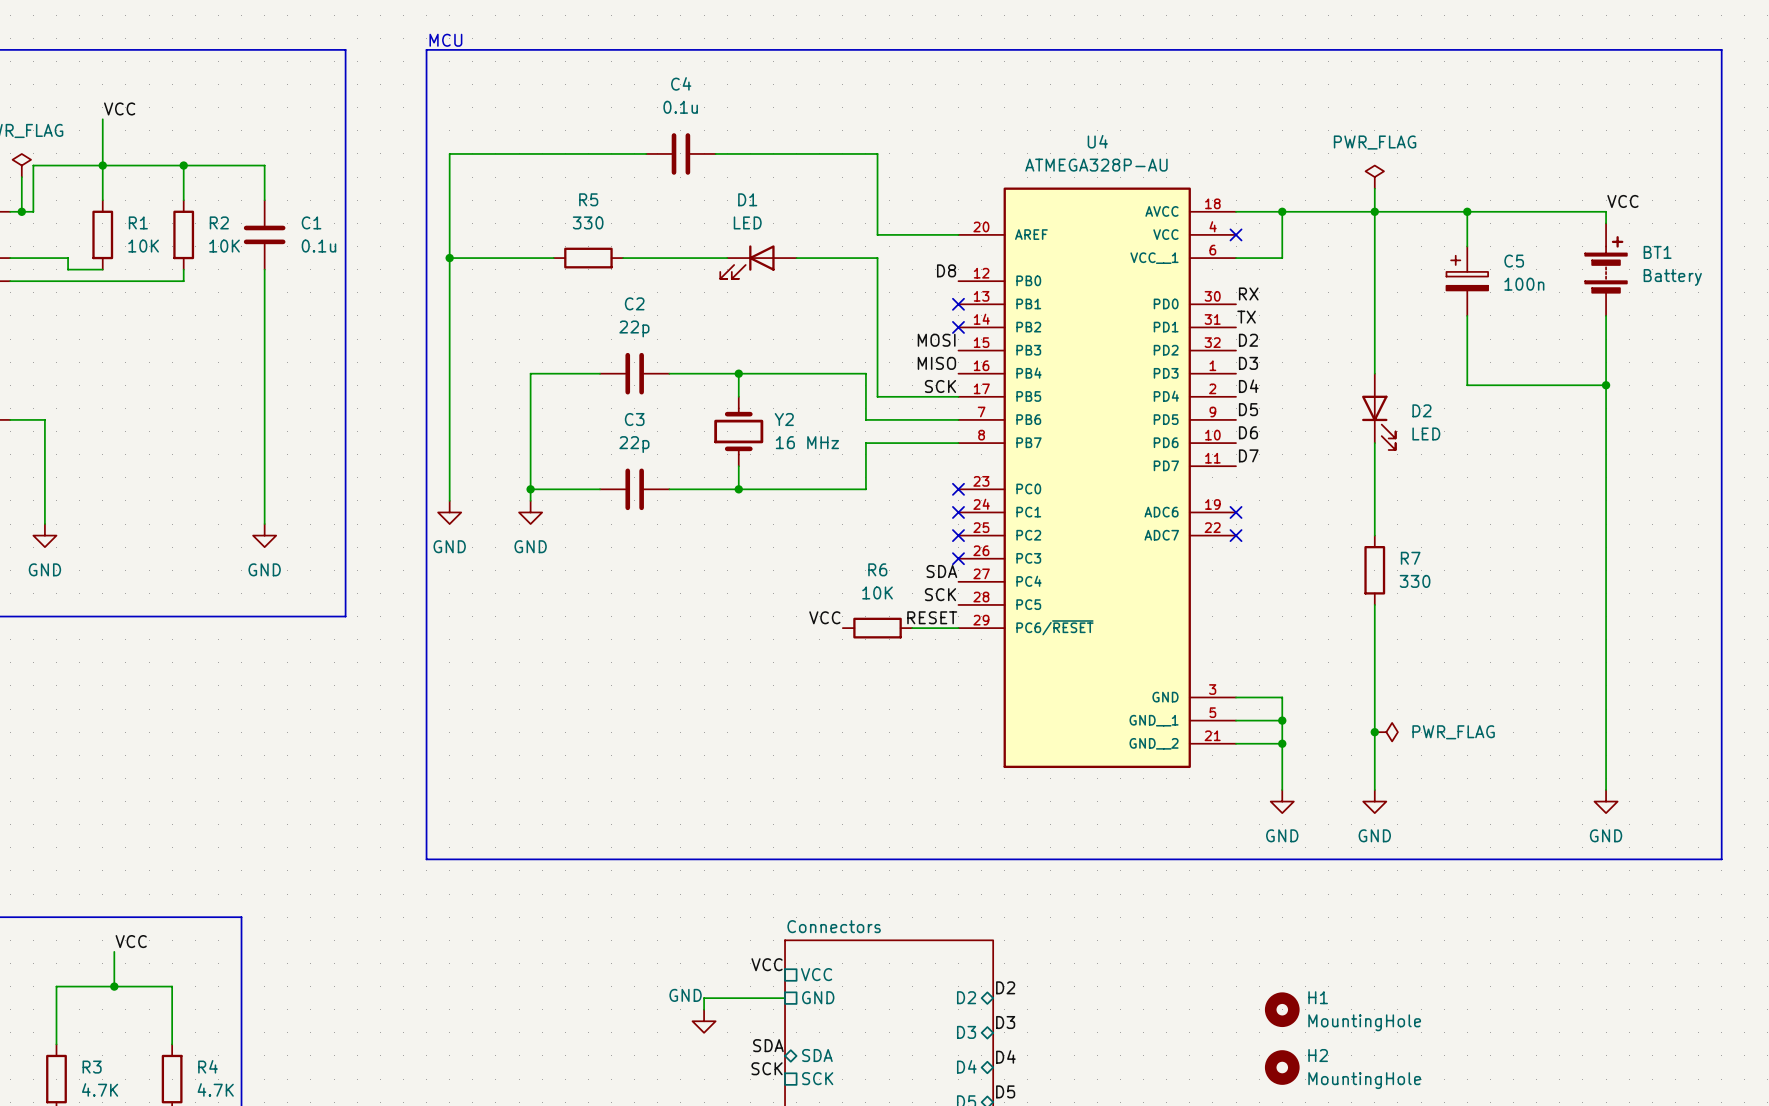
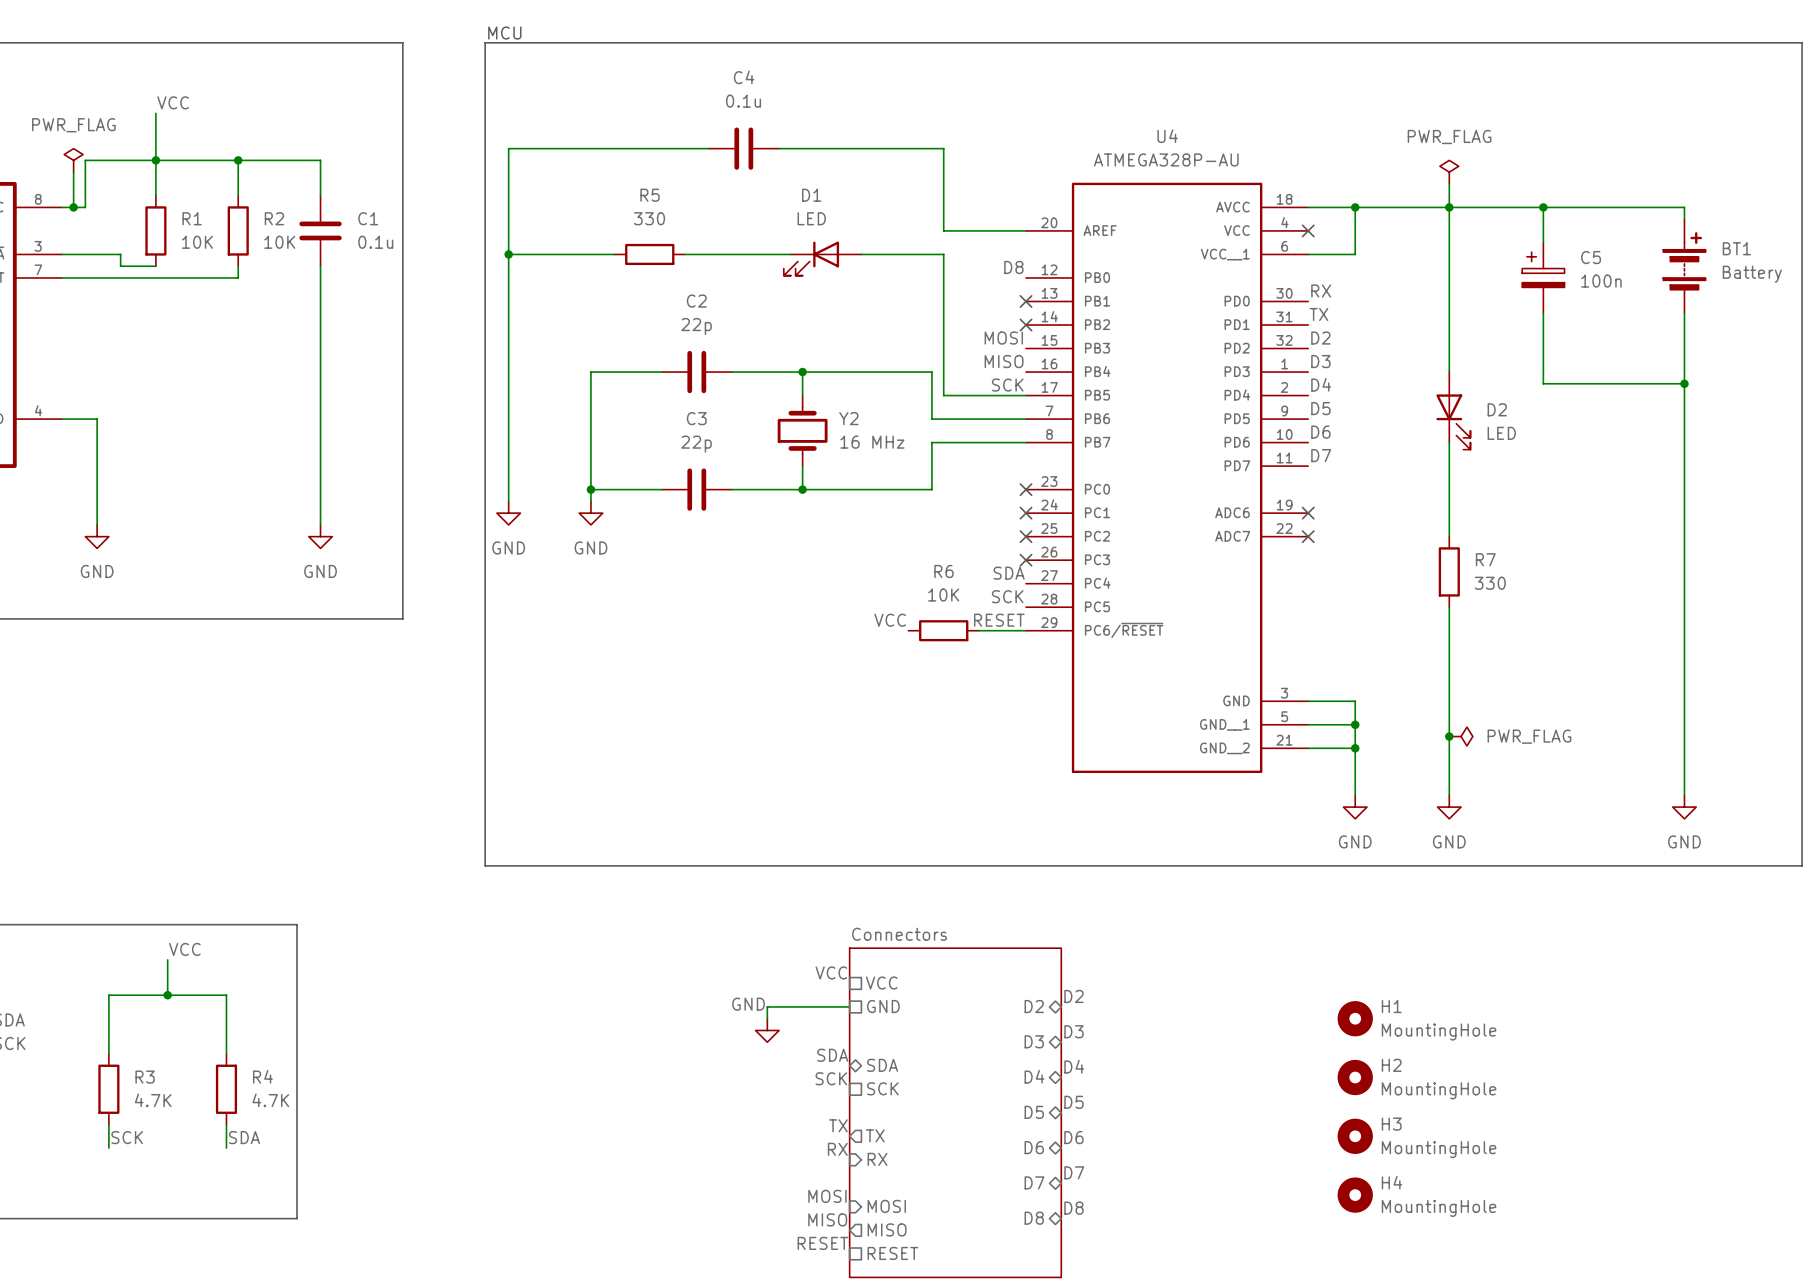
label: VCC (1622, 201) -> none

